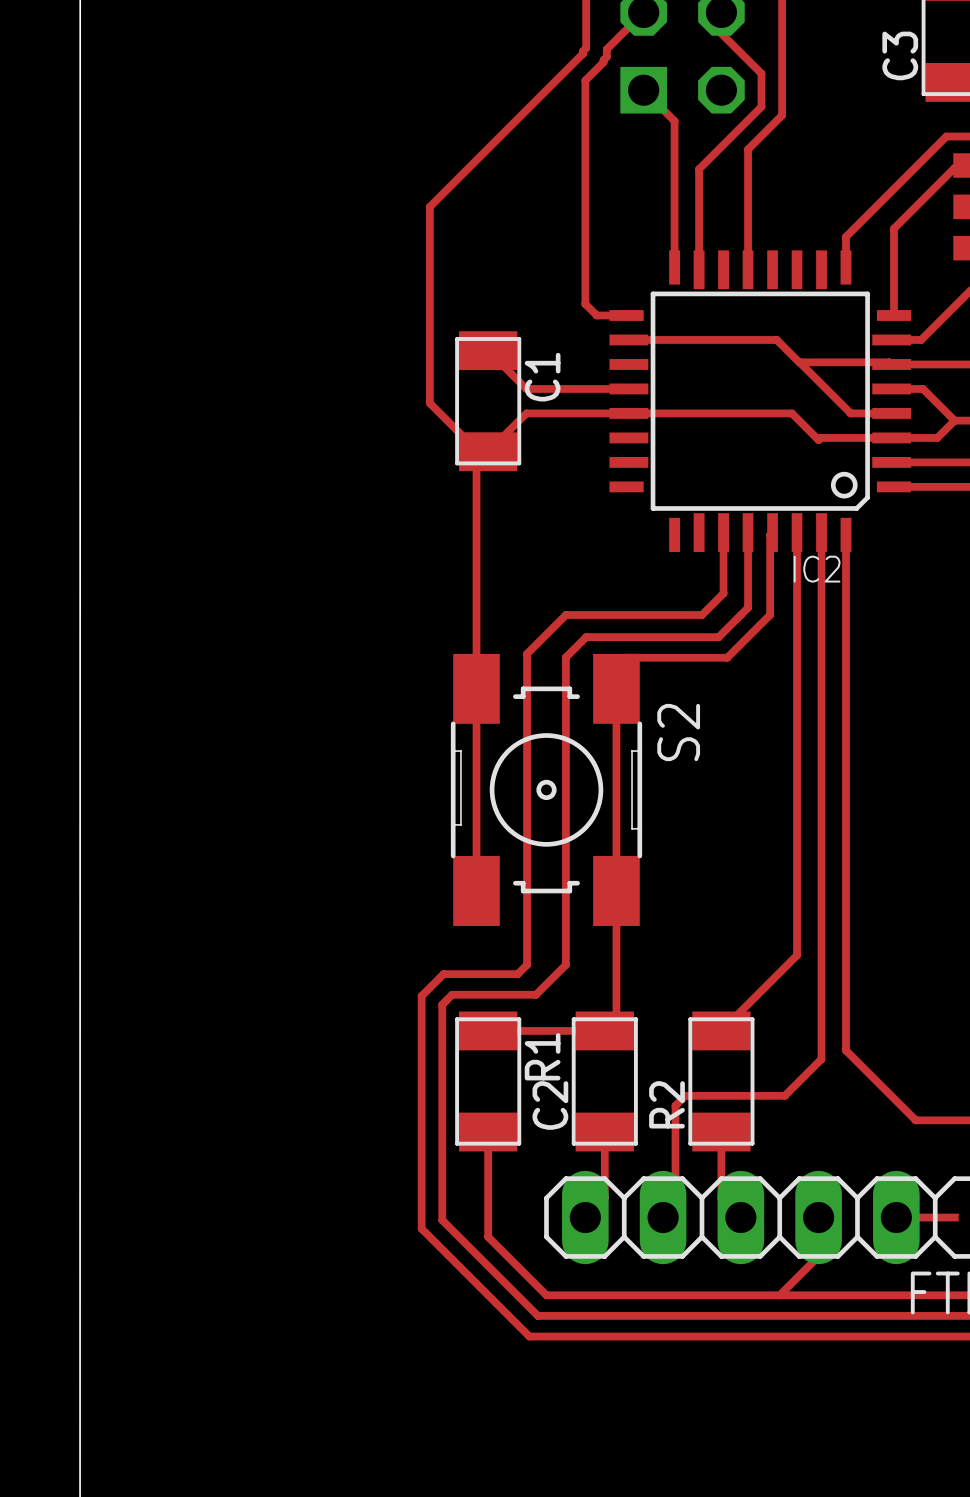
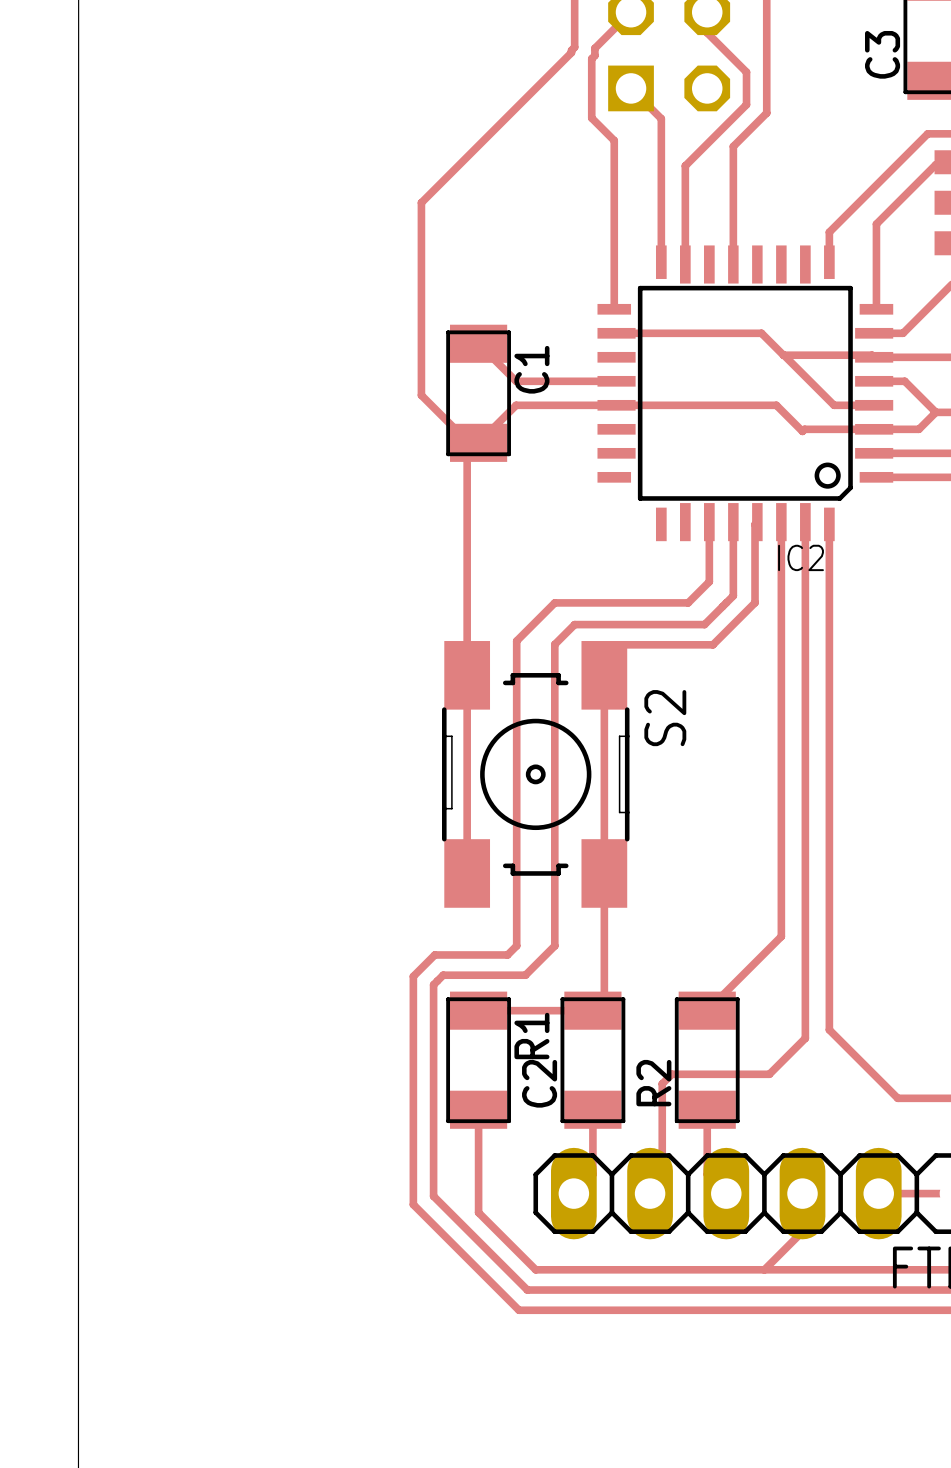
top track: (603, 62) (585, 80) (585, 304) (596, 315) (626, 315) -> (591, 61) (591, 118) (614, 140) (614, 309)

